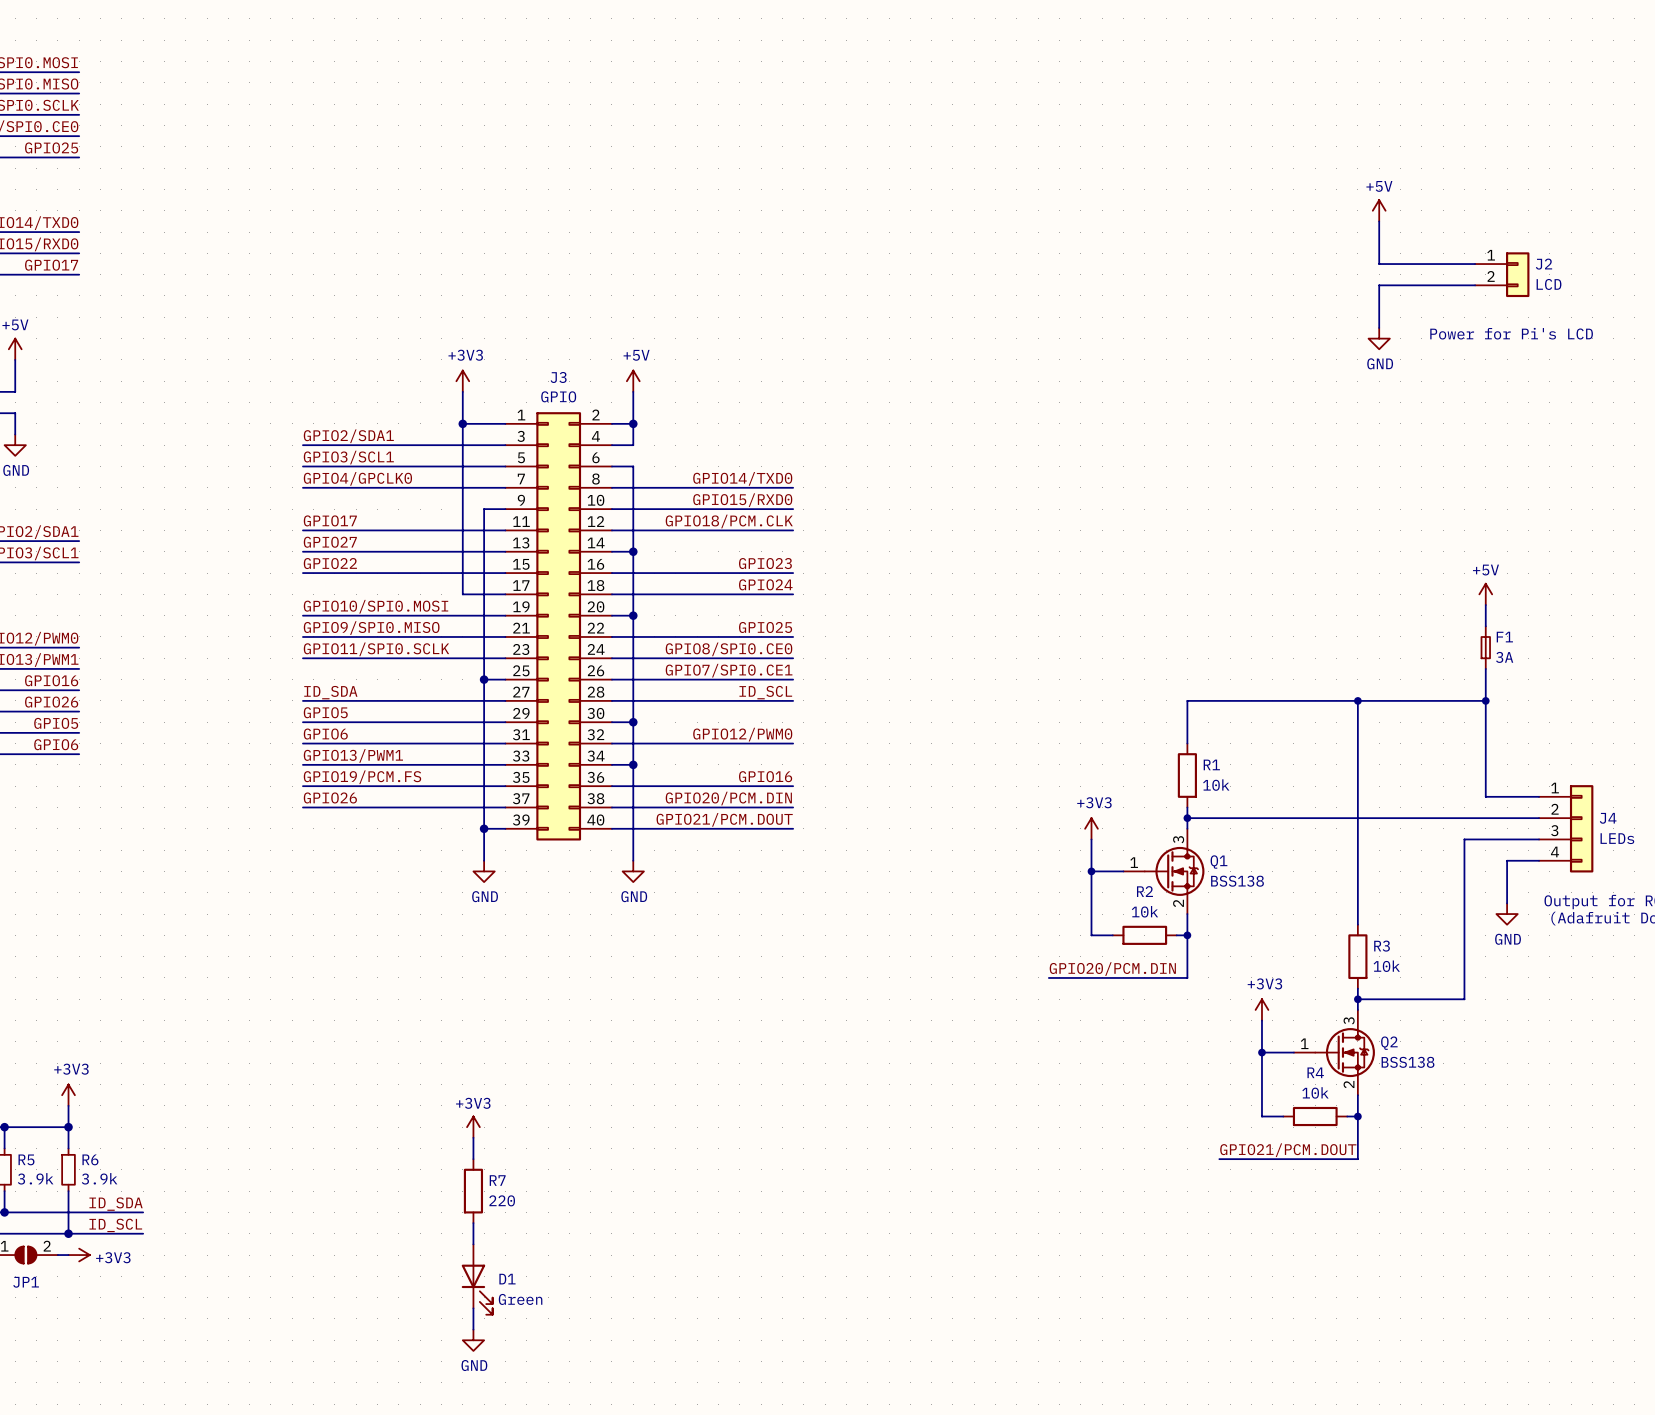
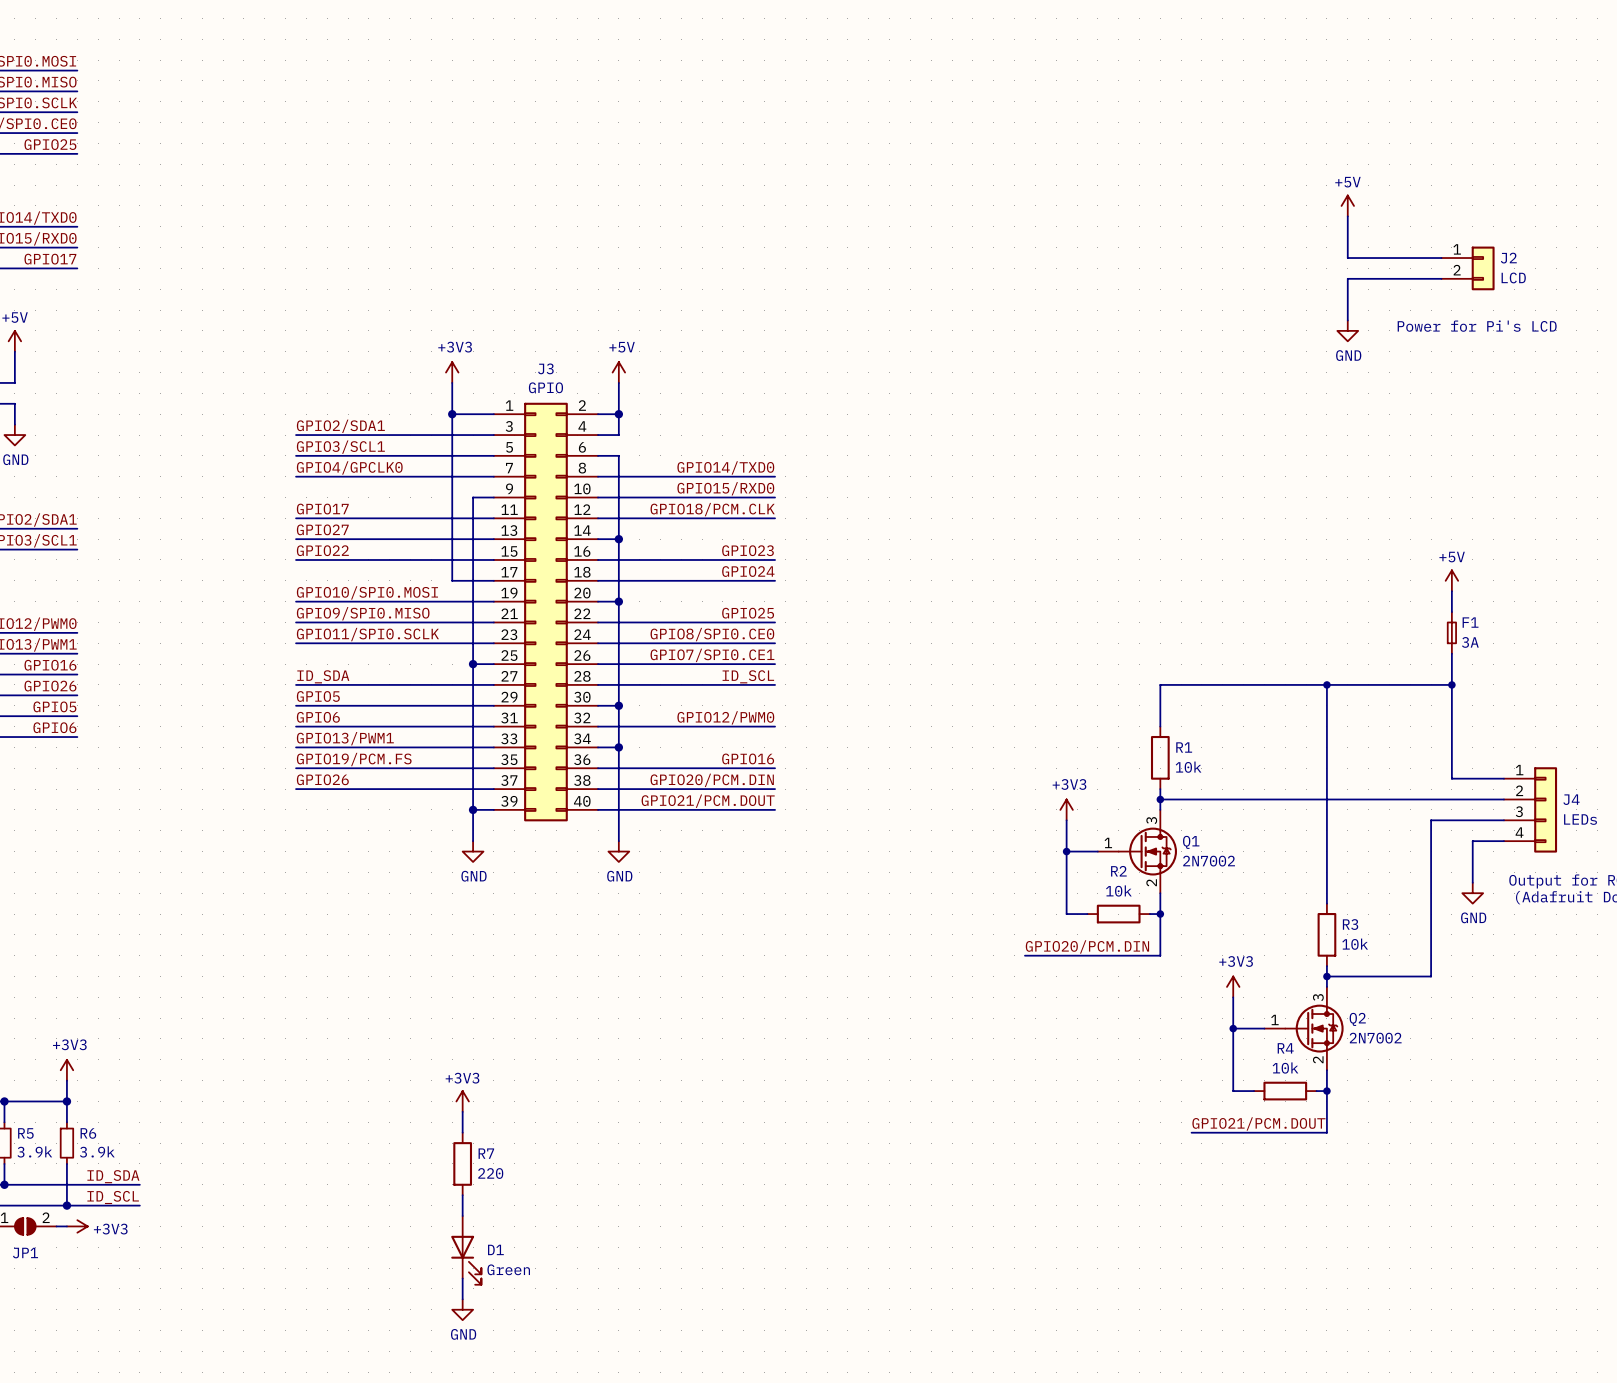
Q1 value: BSS138 (1237, 881) -> 2N7002 (1209, 861)
Q2 value: BSS138 (1408, 1062) -> 2N7002 (1375, 1038)

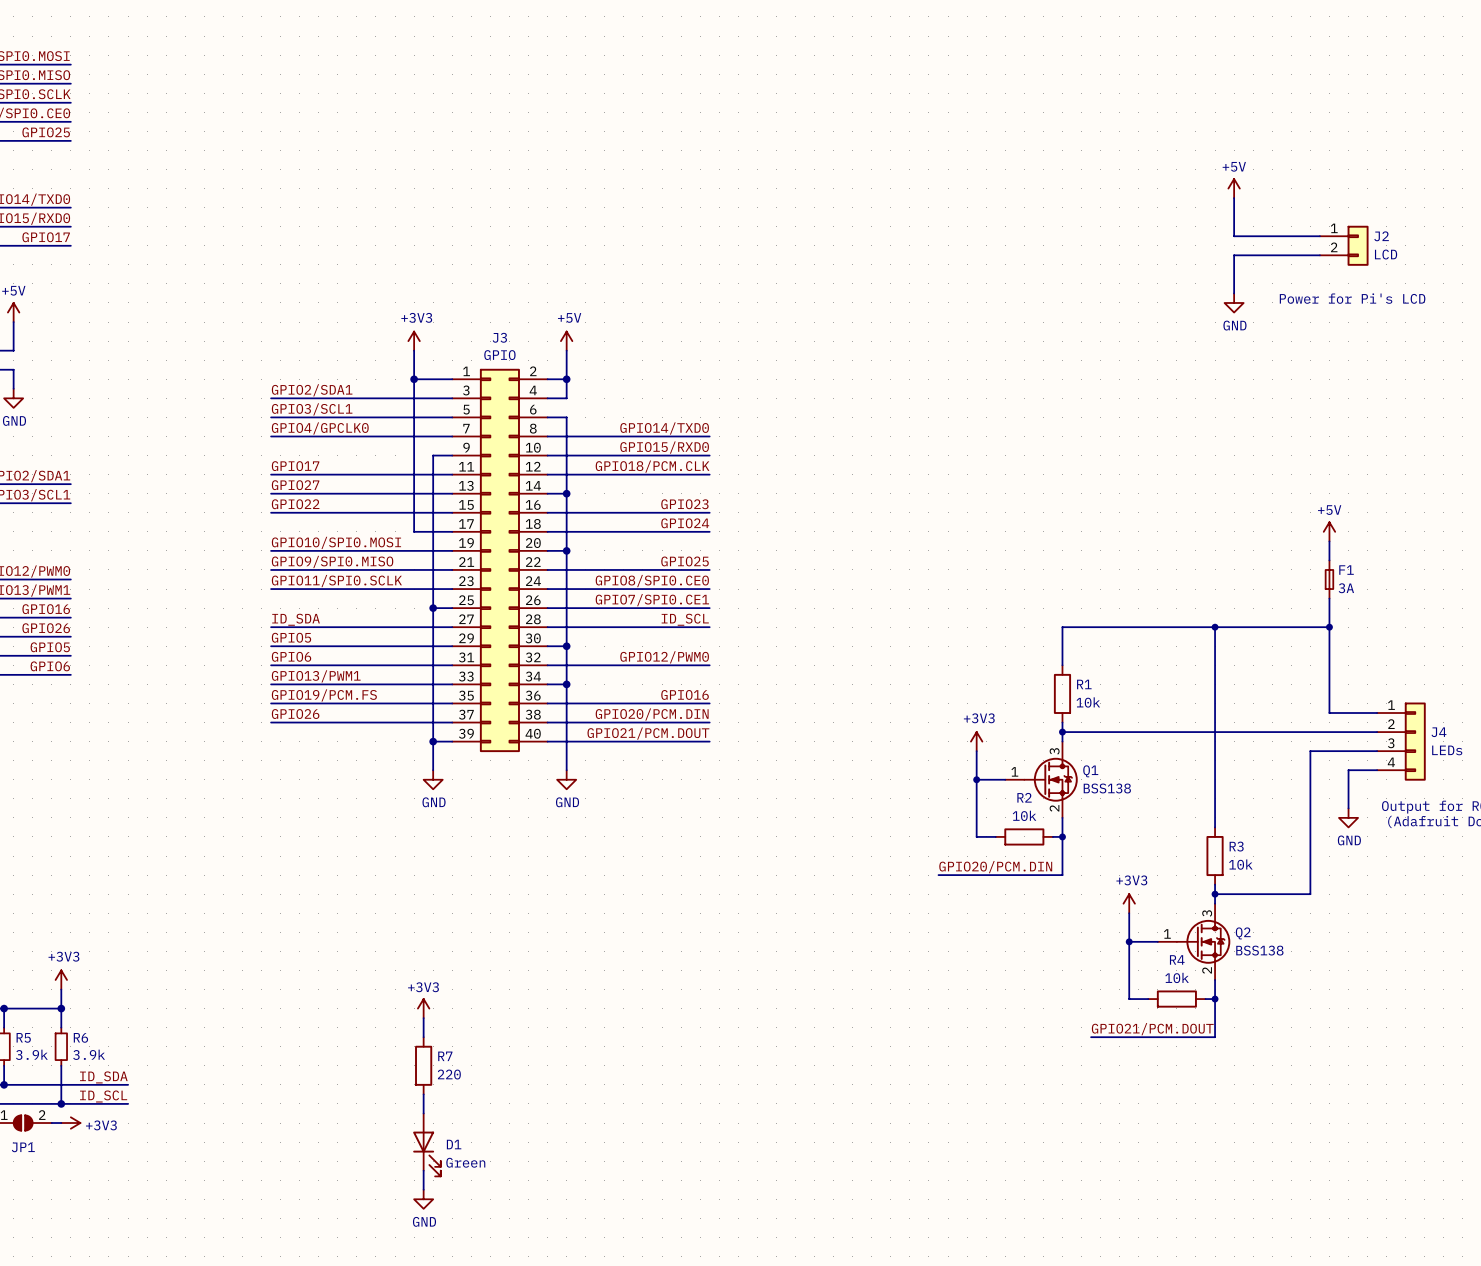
Q1 value: 2N7002 (1209, 861) -> BSS138 (1107, 788)
Q2 value: 2N7002 (1375, 1038) -> BSS138 (1259, 950)

